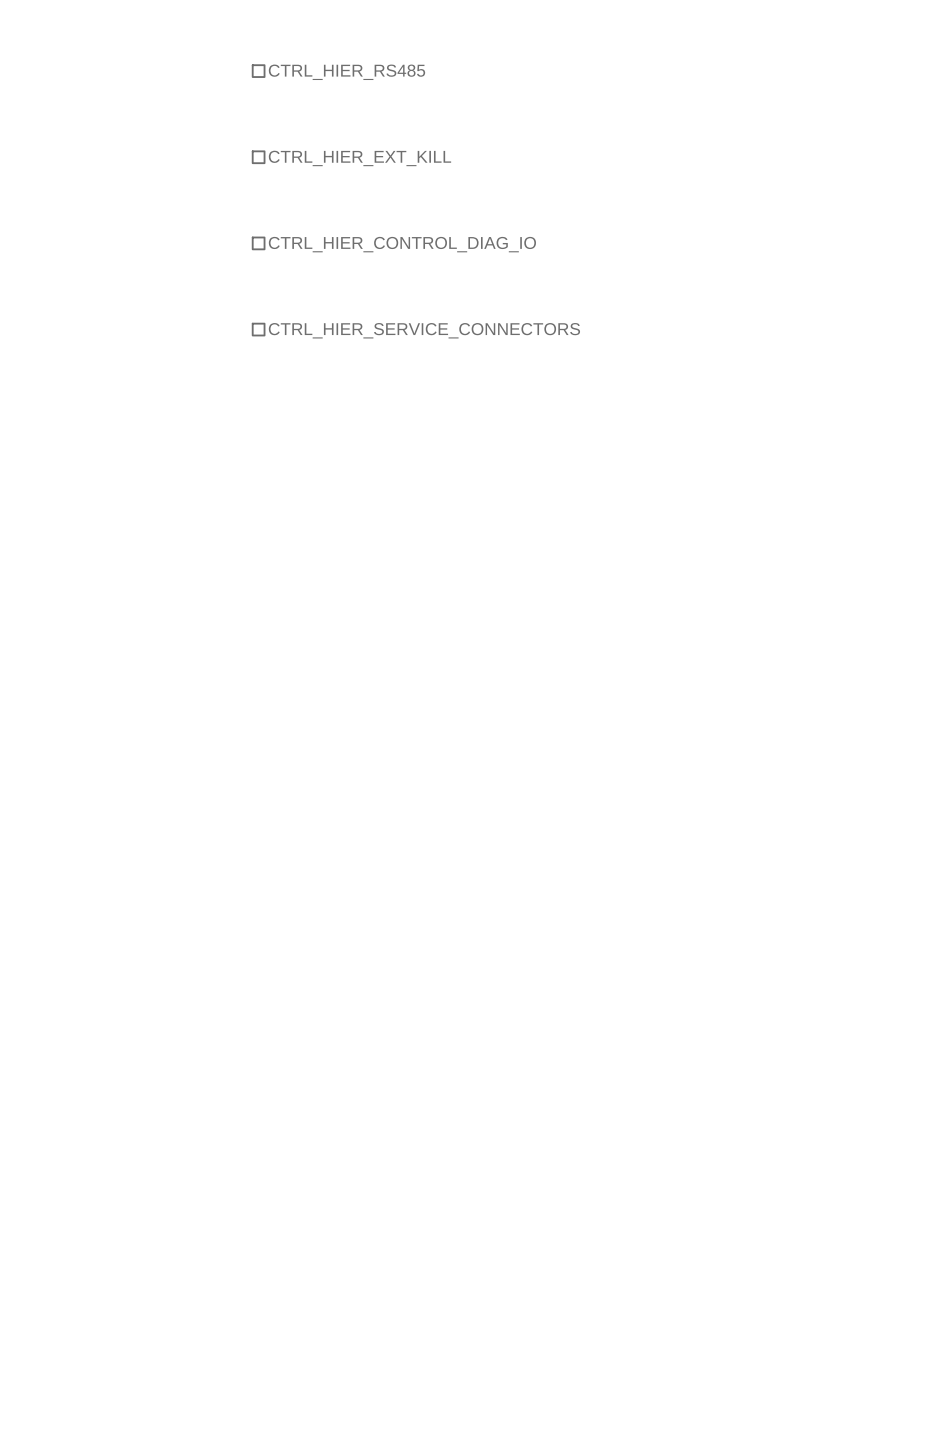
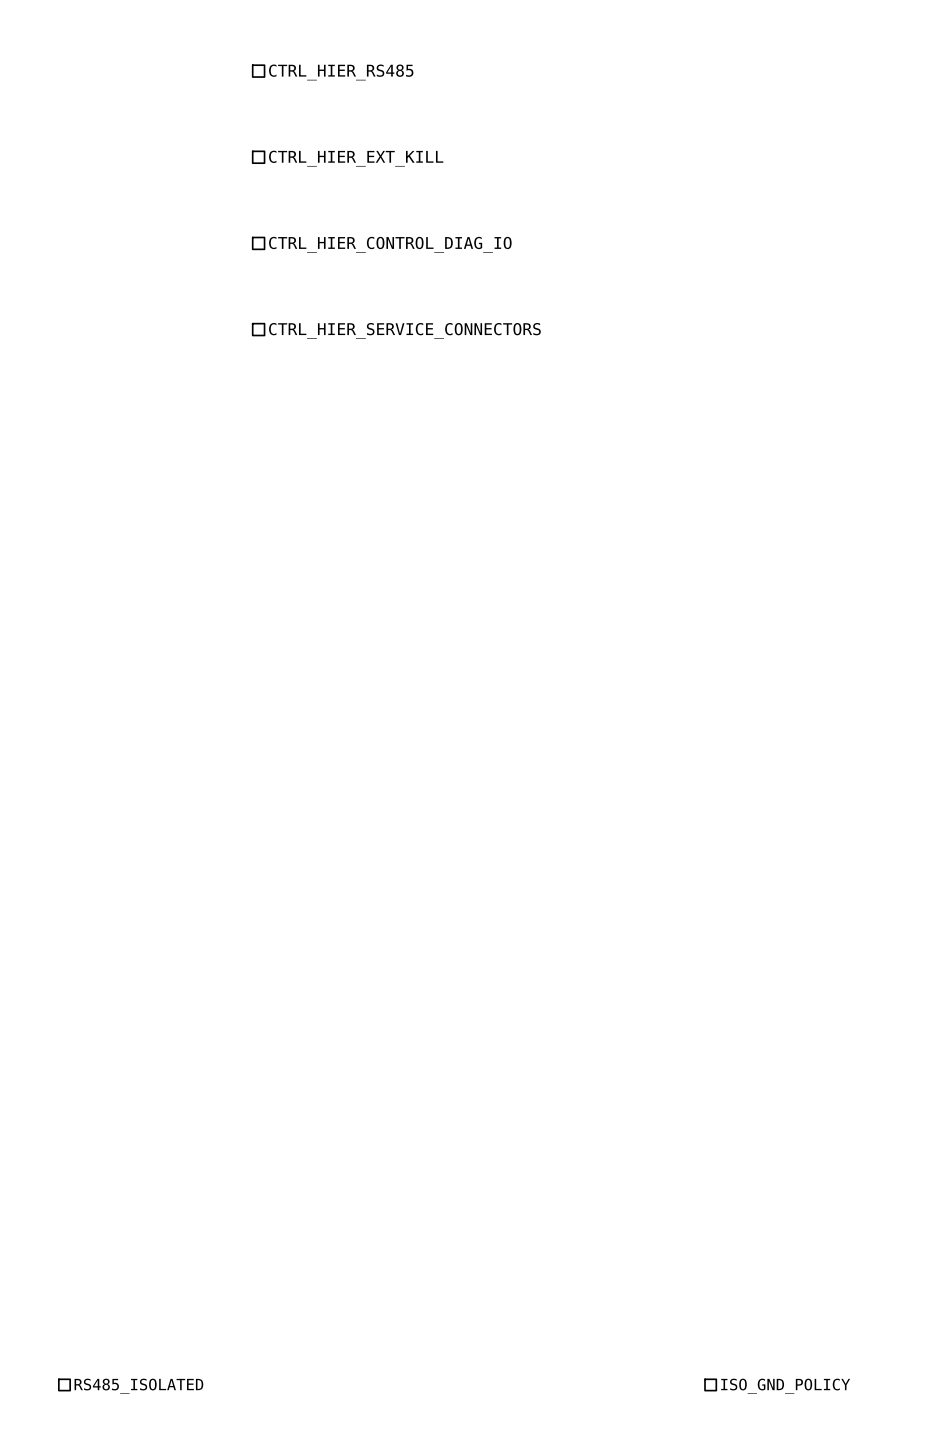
hierarchical label: none -> RS485_ISOLATED (138, 1386)
hierarchical label: none -> ISO_GND_POLICY (785, 1386)

